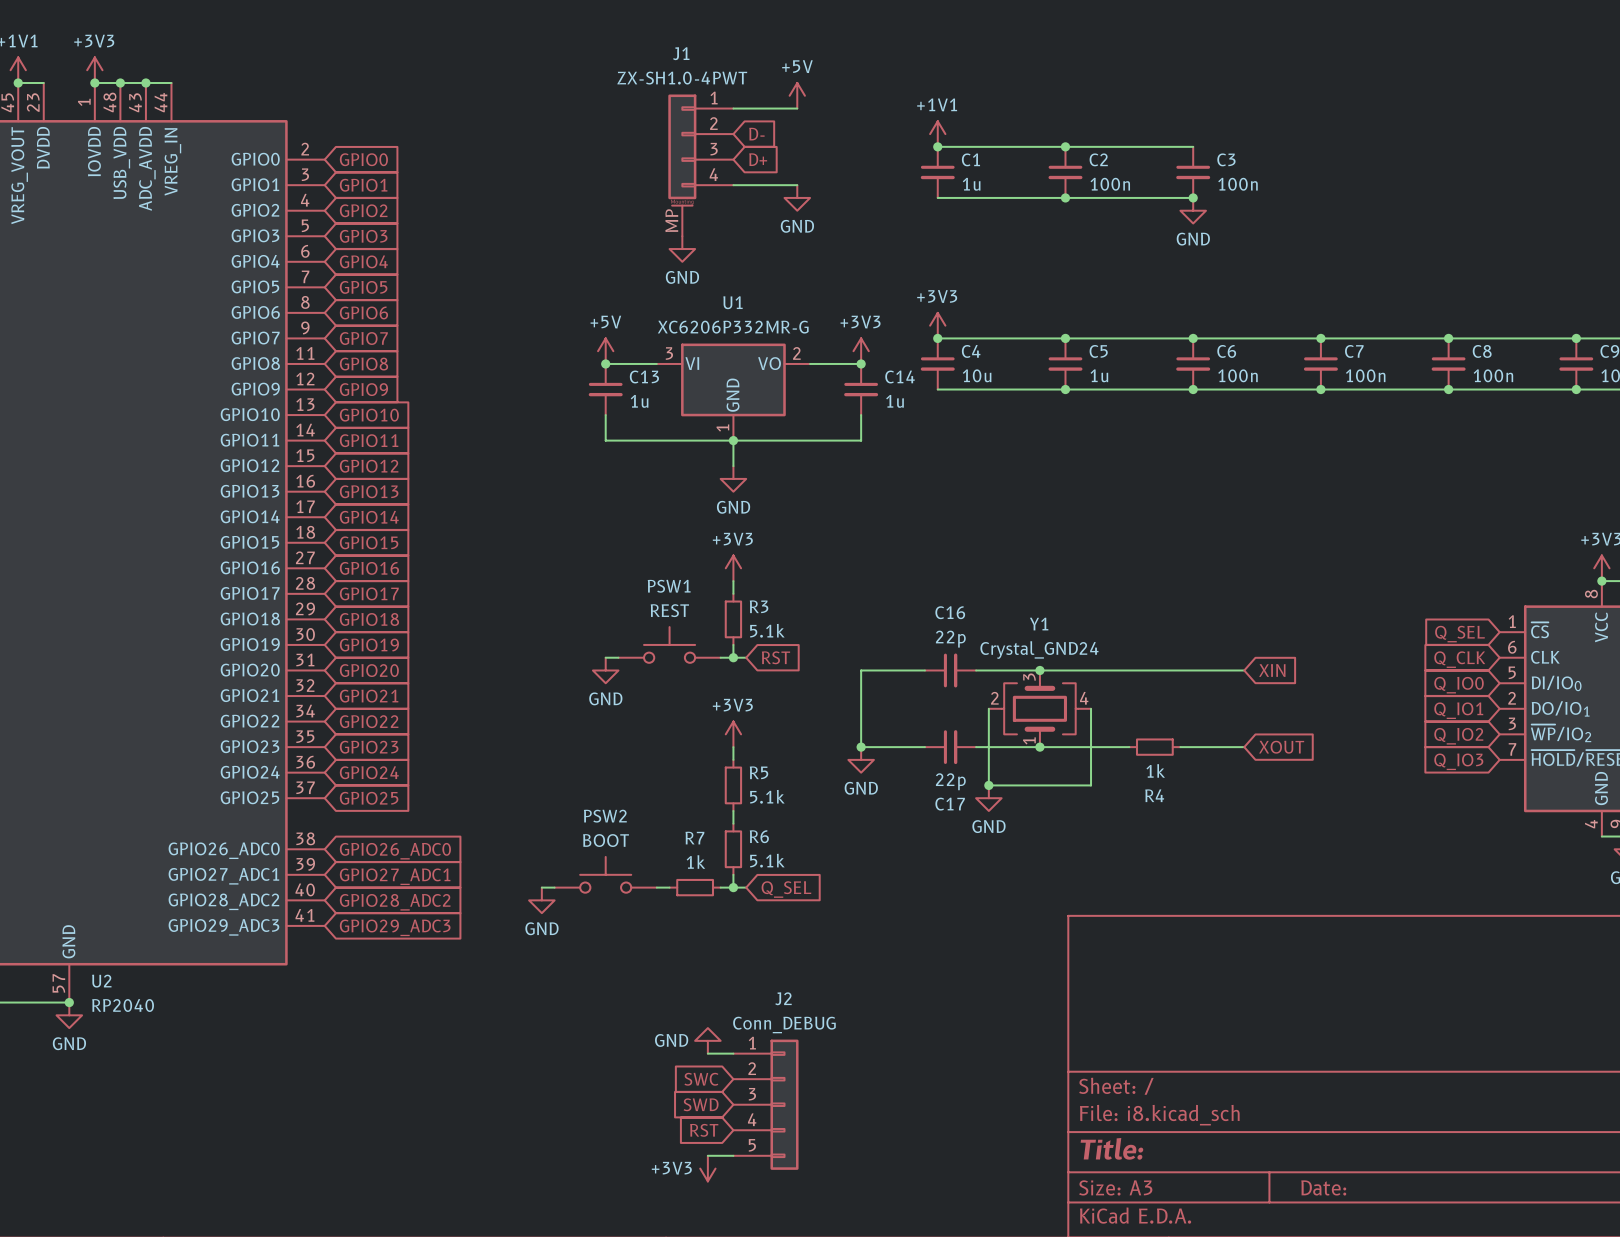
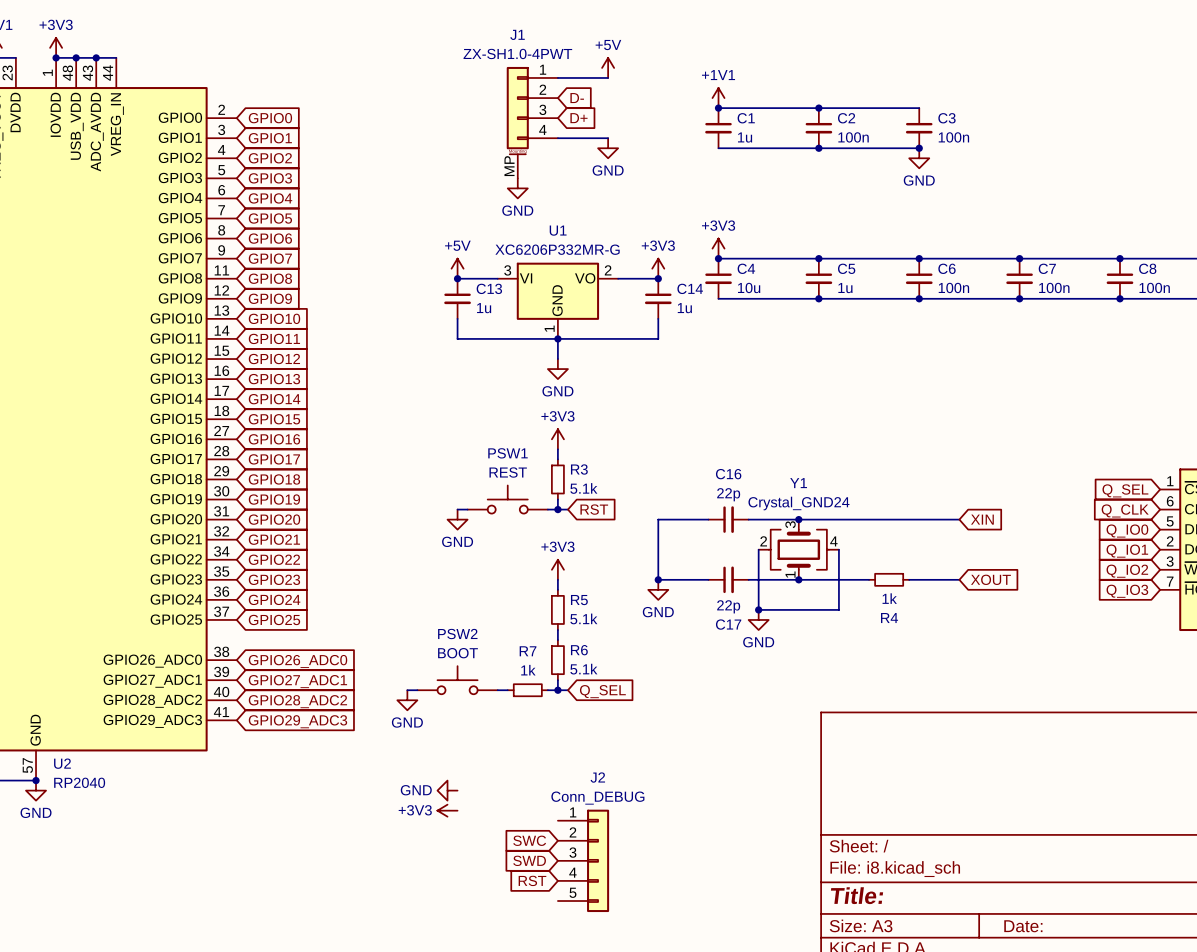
power symbol rotation: 0° (707, 1040) -> 90° counterclockwise (447, 790)
power symbol position: GND (707, 1040) -> GND (447, 790)
wire: (707, 1053) (733, 1053) -> none
wire: (707, 1155) (733, 1155) -> none
power symbol rotation: 0° (707, 1168) -> 90° clockwise (447, 810)
power symbol position: +3V3 (707, 1168) -> +3V3 (447, 810)

